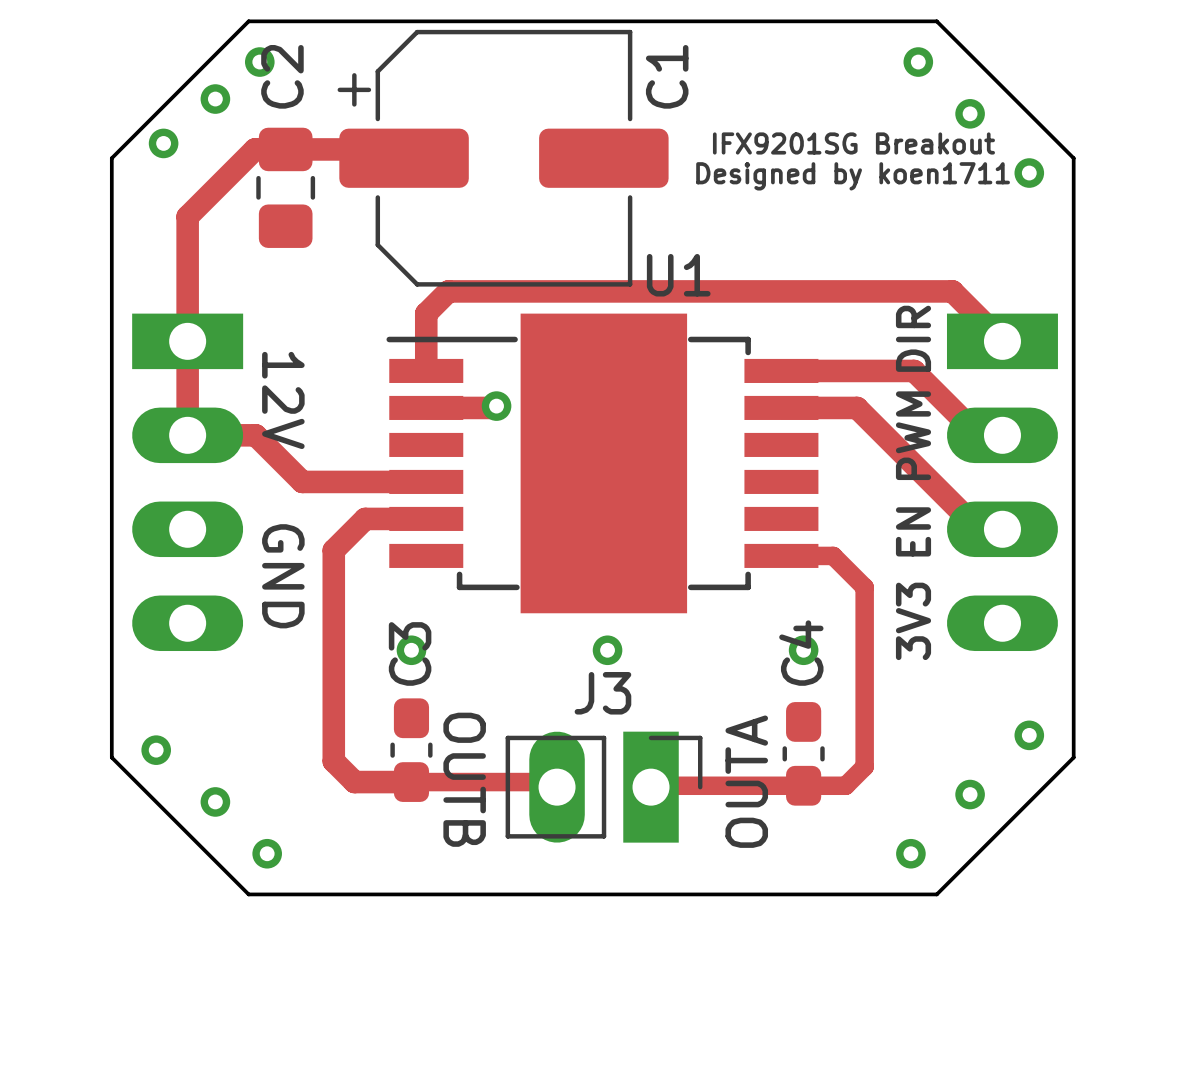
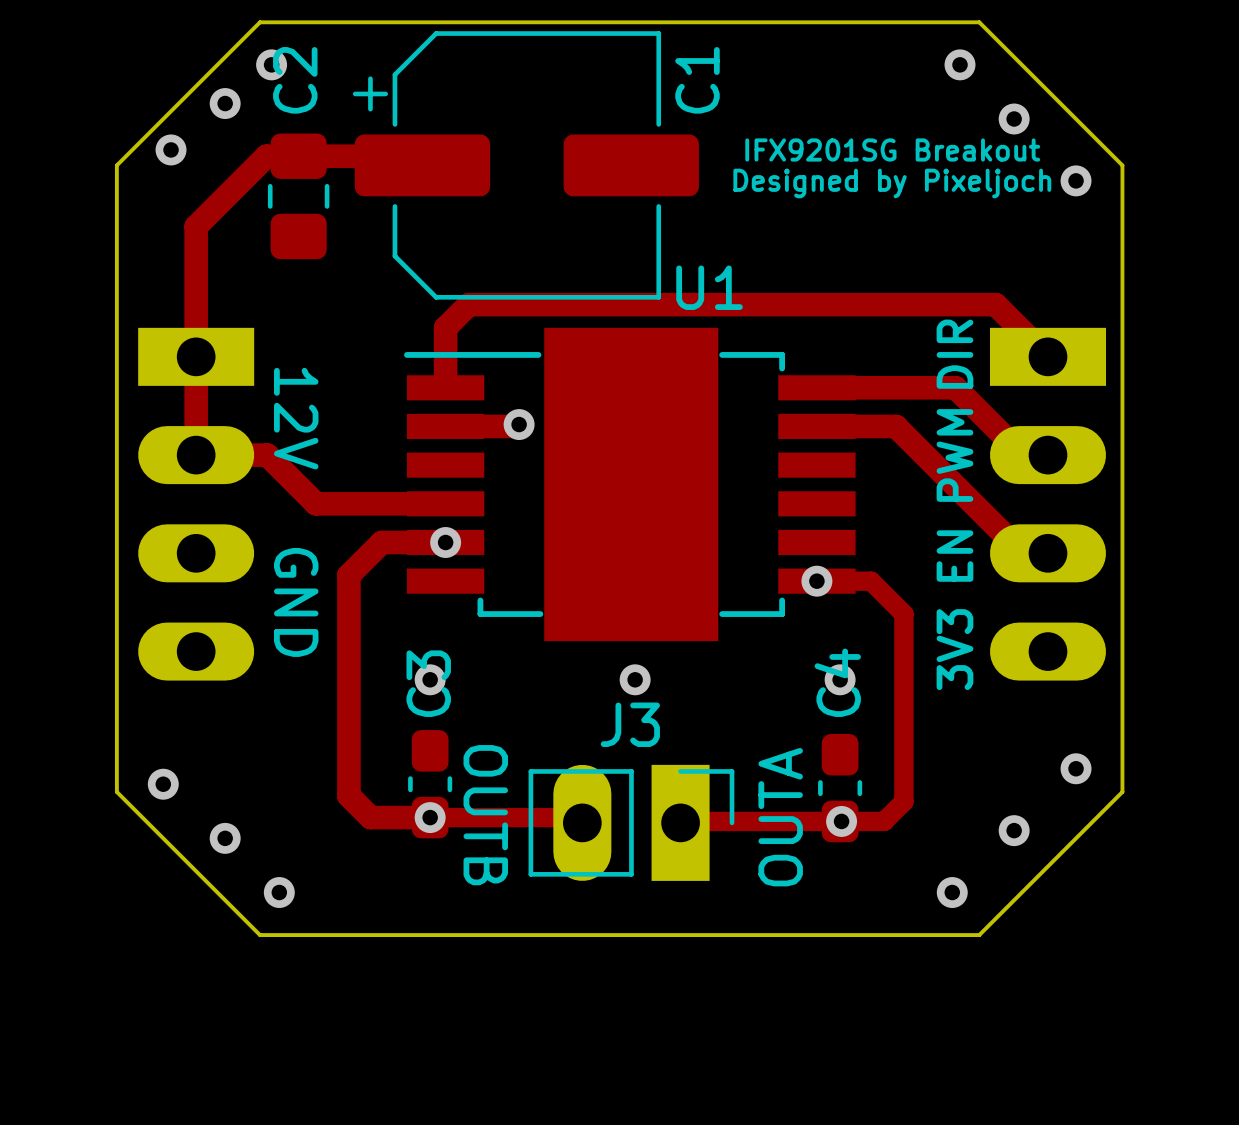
text: Designed by koen1711 (853, 176) -> Designed by Pixeljoch (892, 183)
via: none -> (445, 542)
via: none -> (816, 581)
via: none -> (430, 817)
via: none -> (841, 821)

